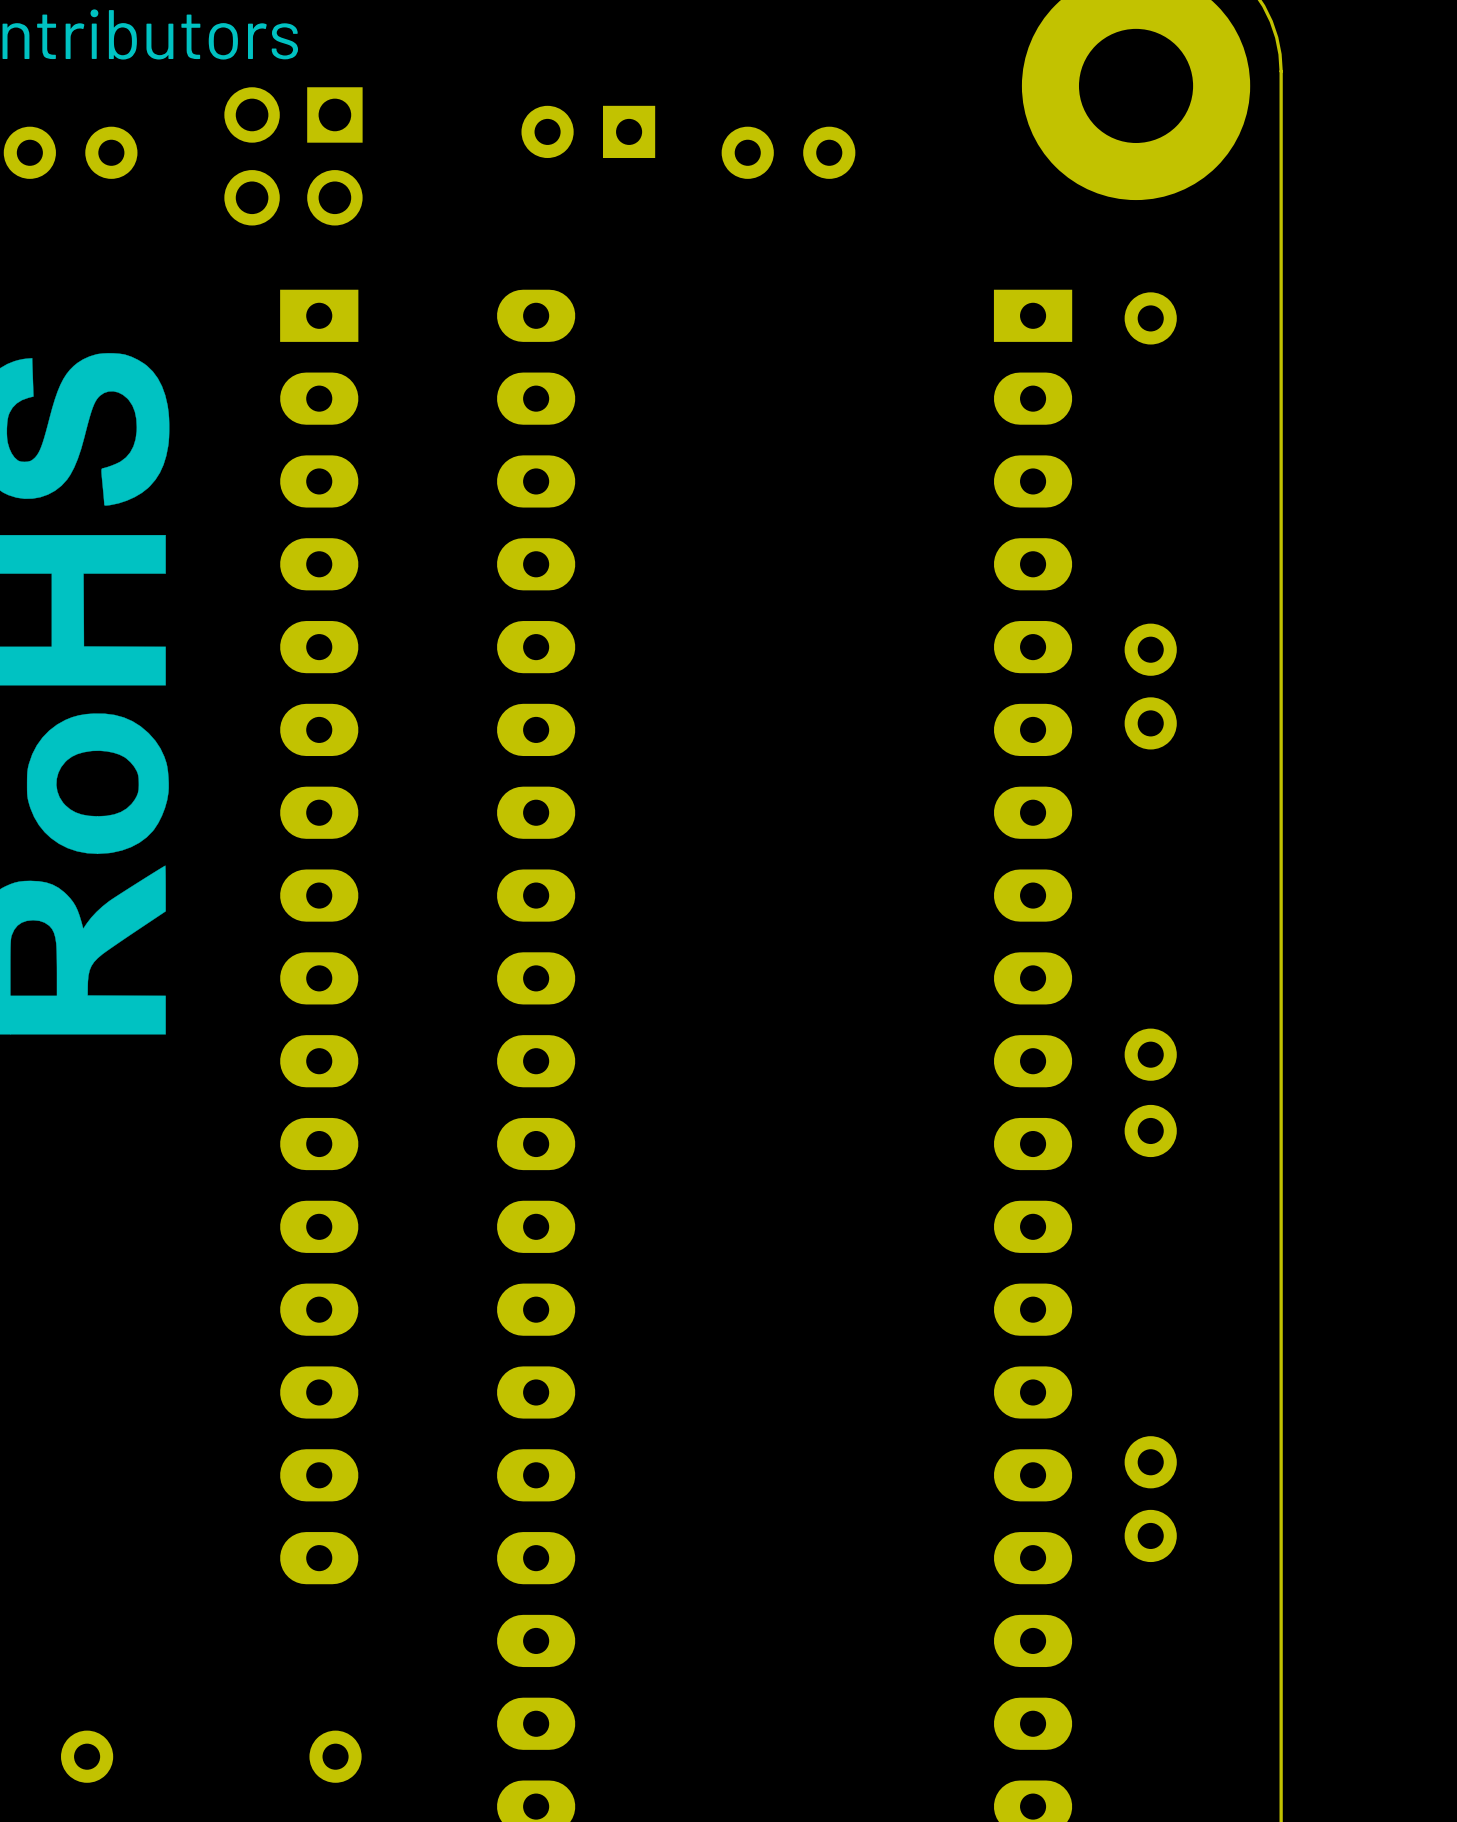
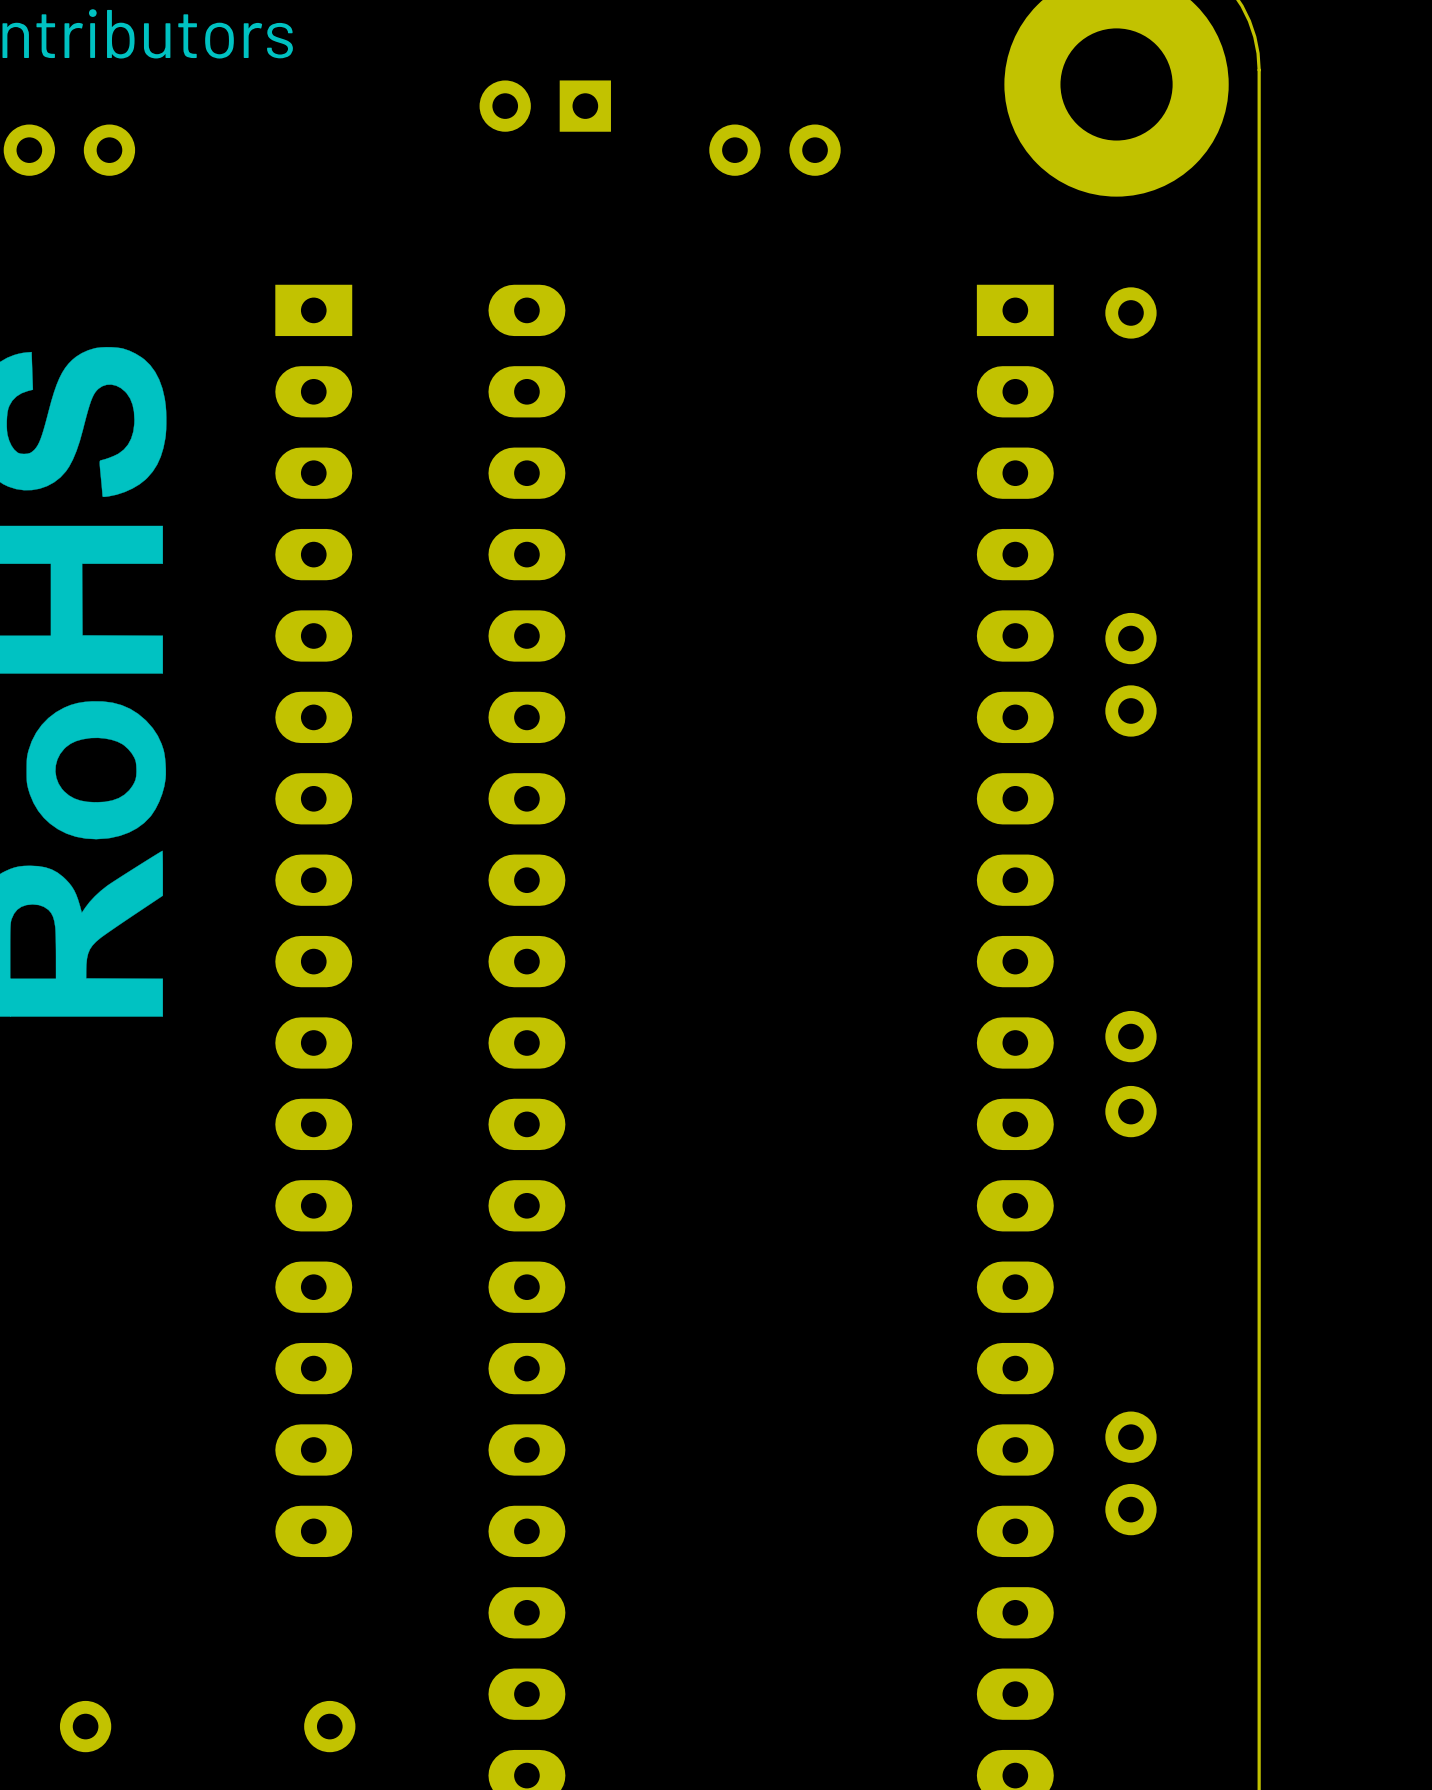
part position: (588, 131) -> (545, 106)
part: (293, 156) -> none

